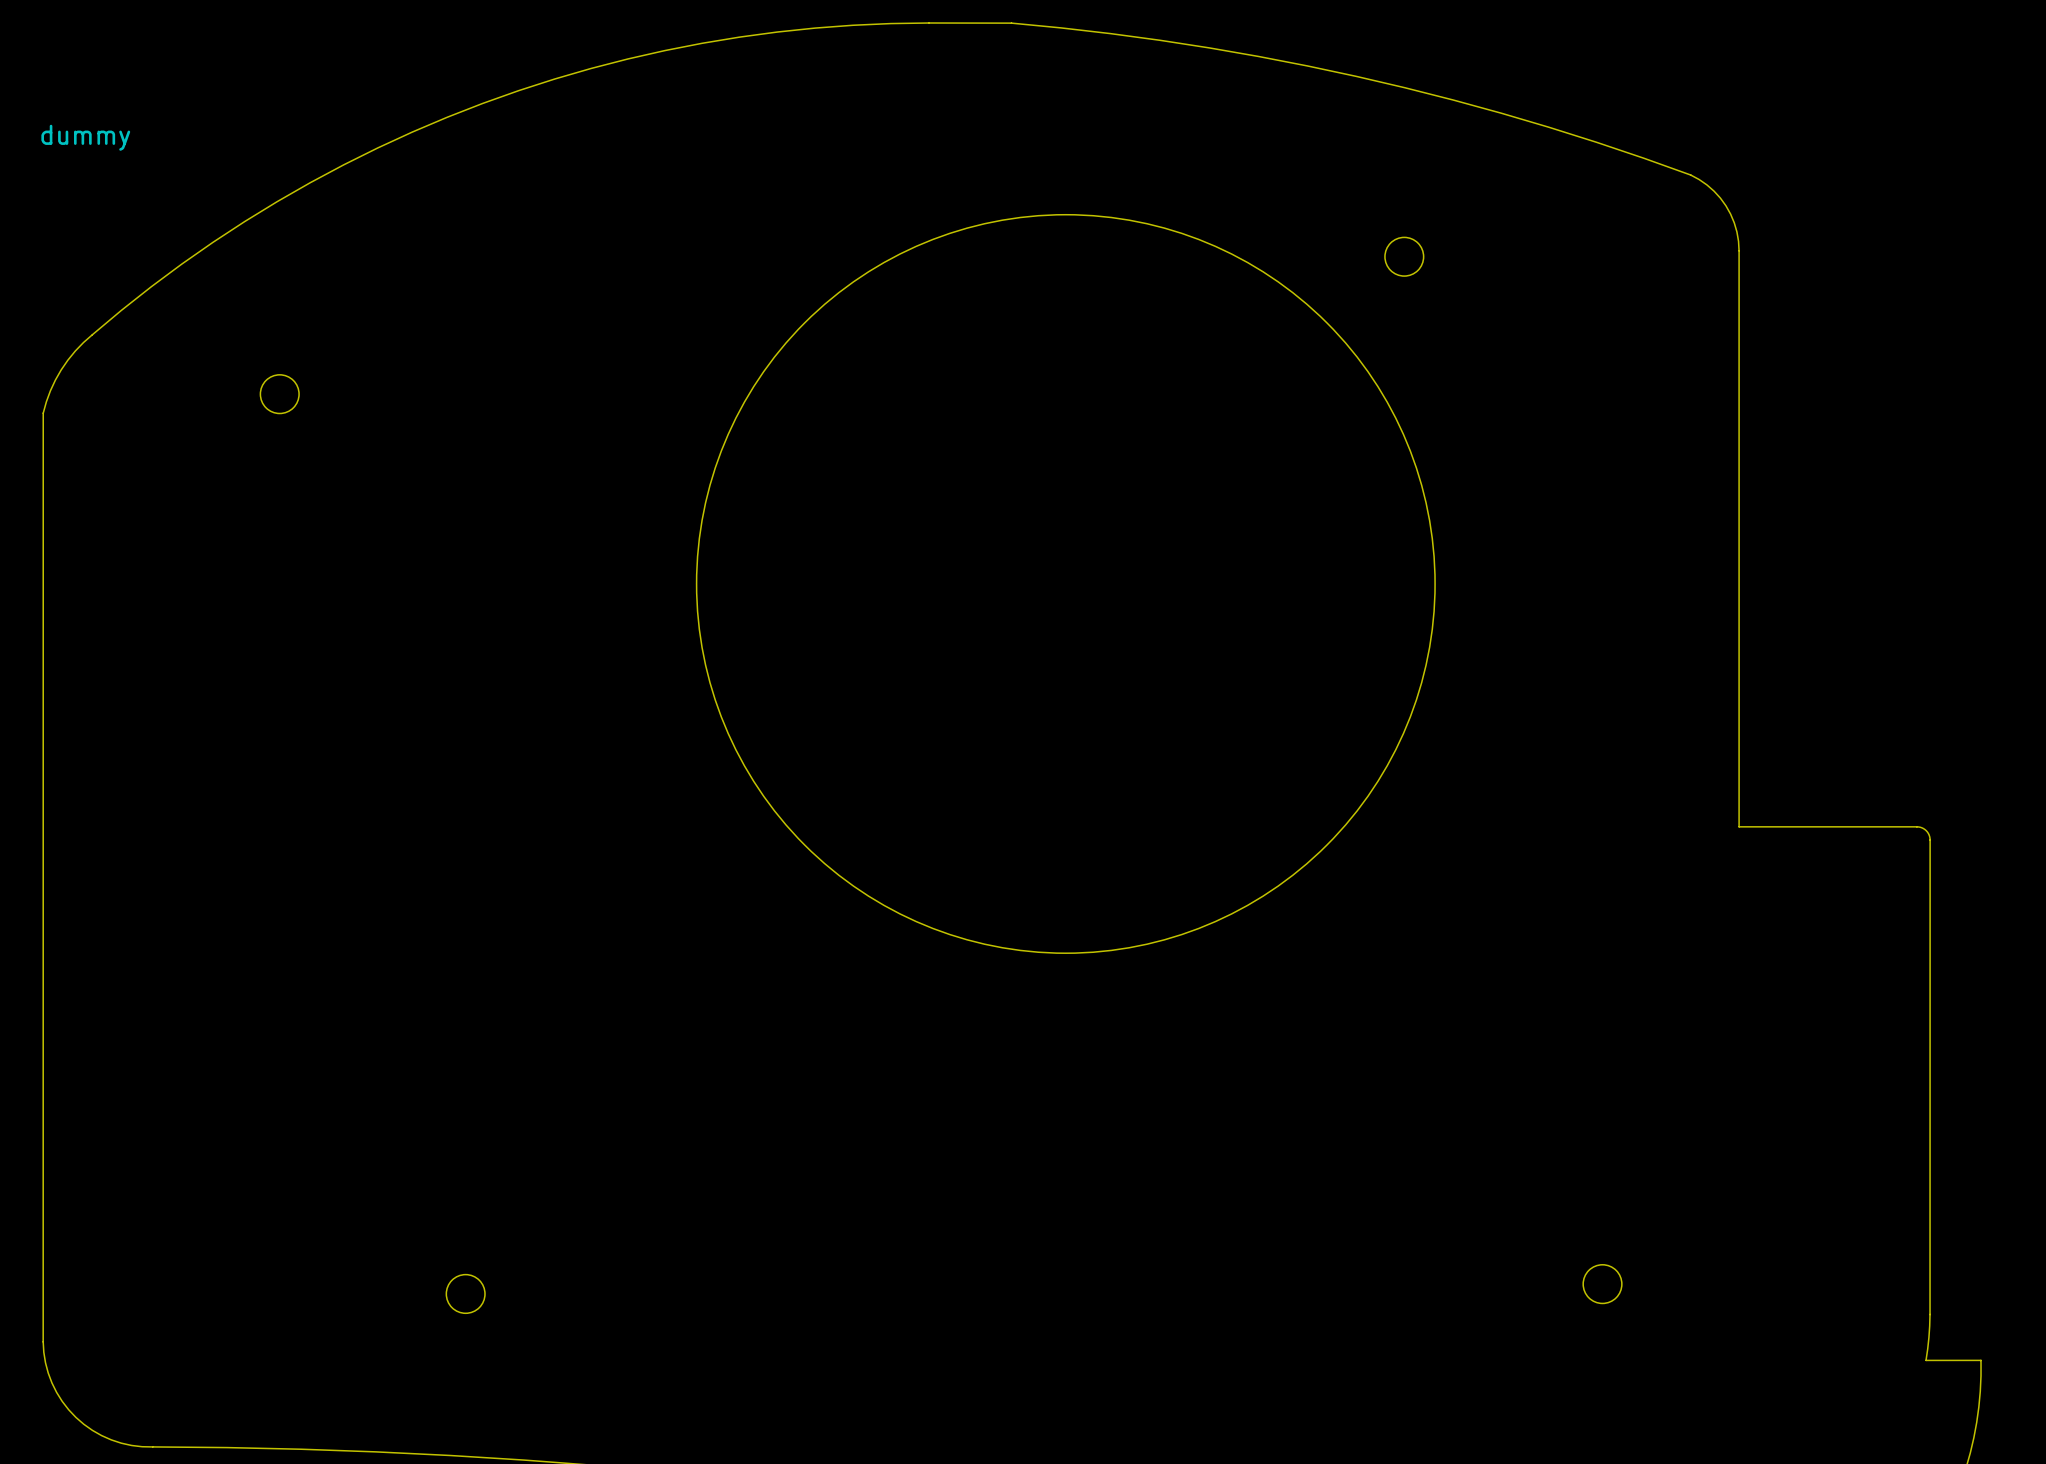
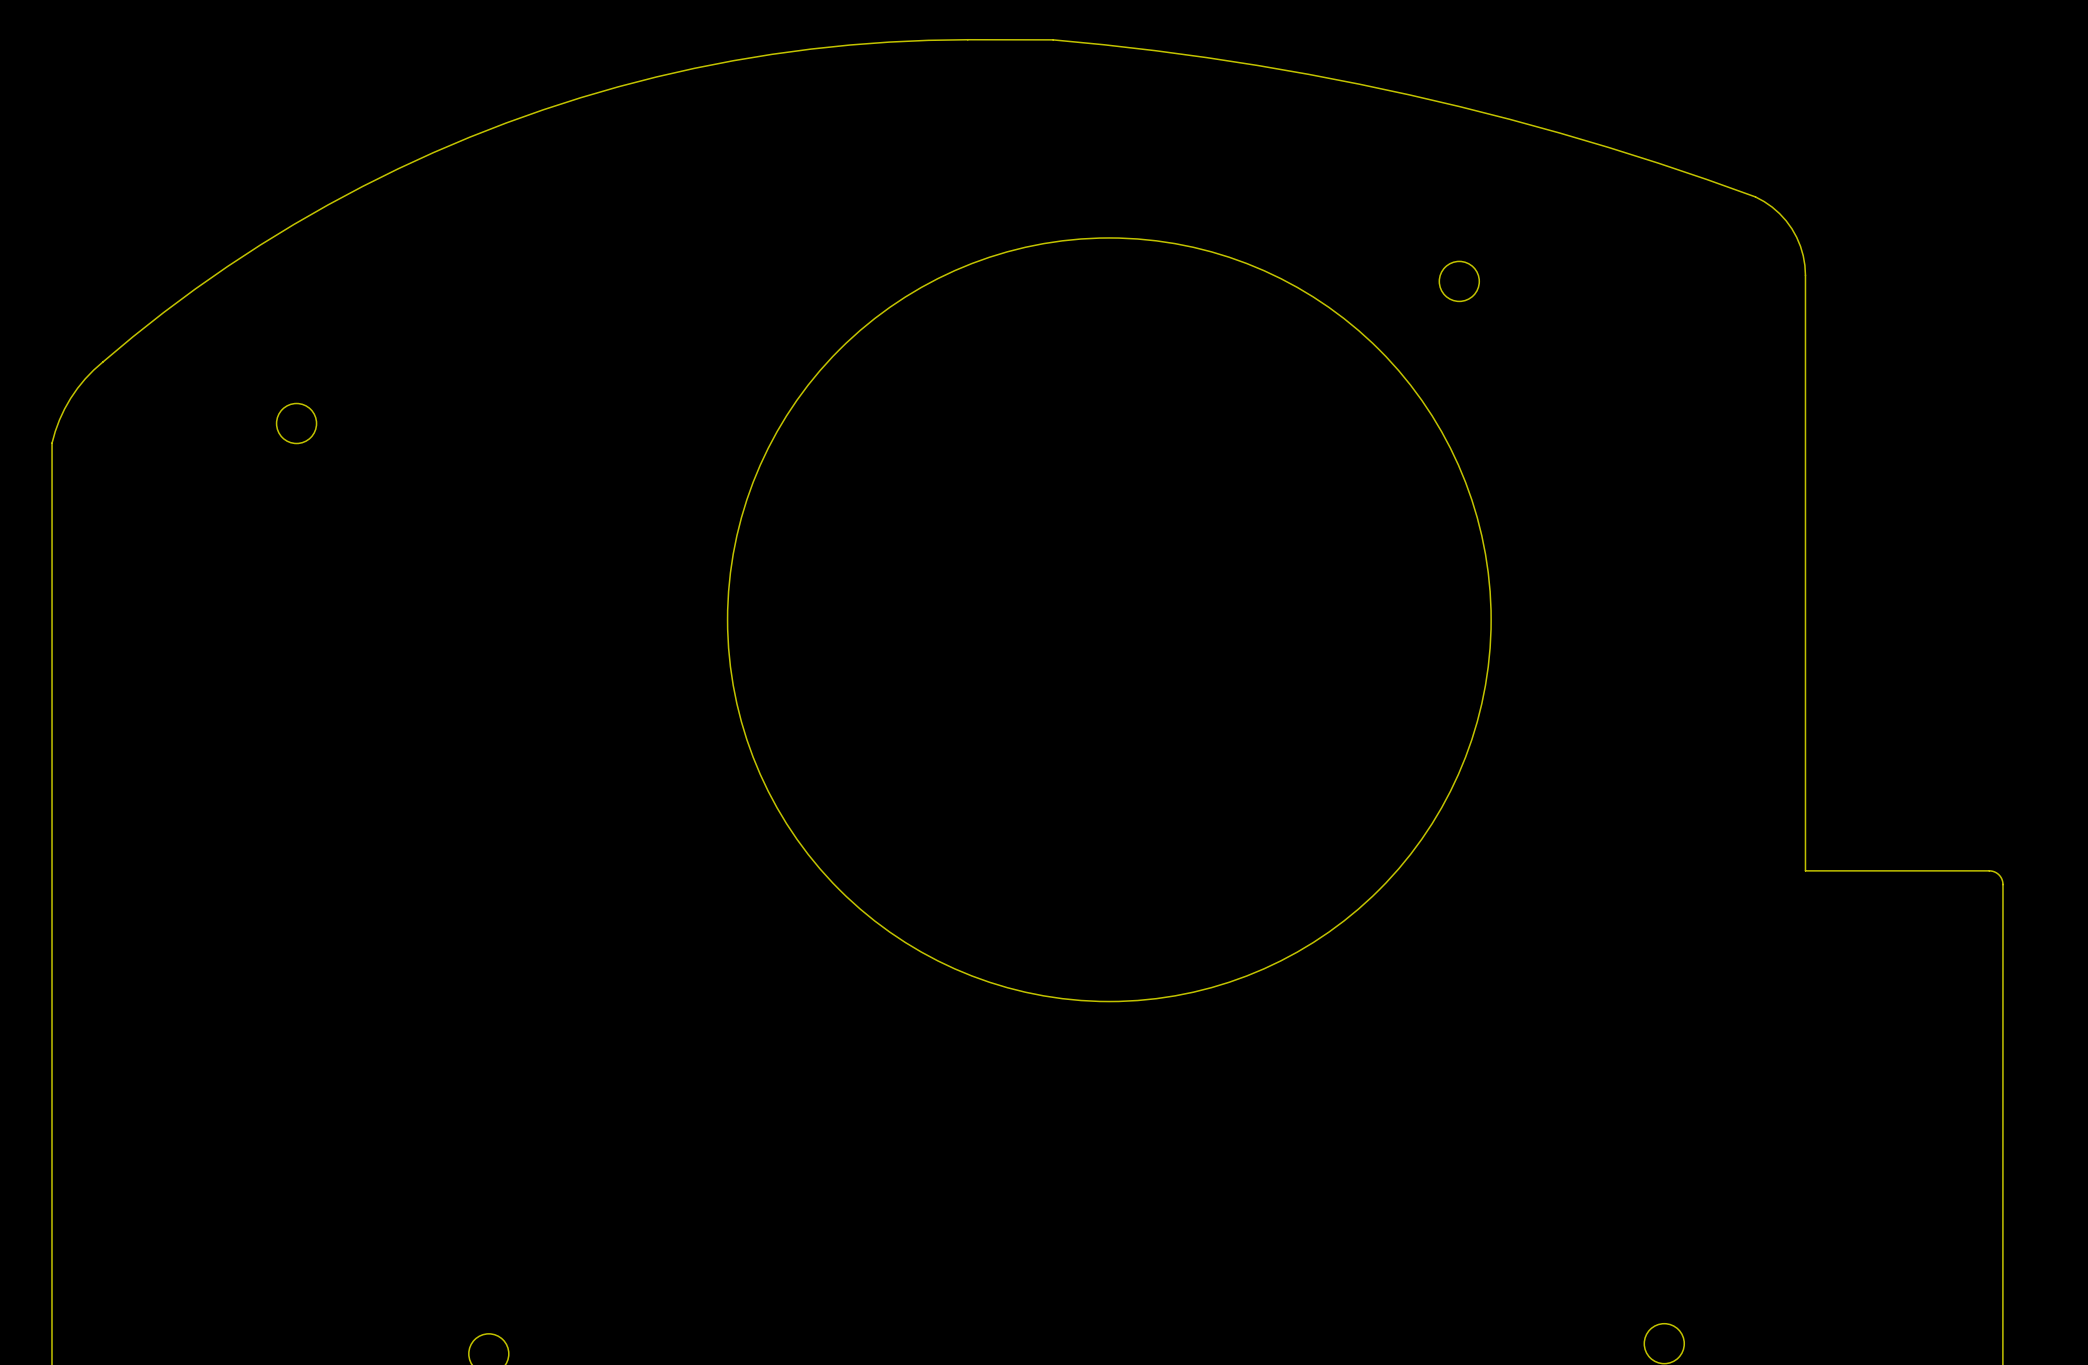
dummy: (85, 137) -> none

